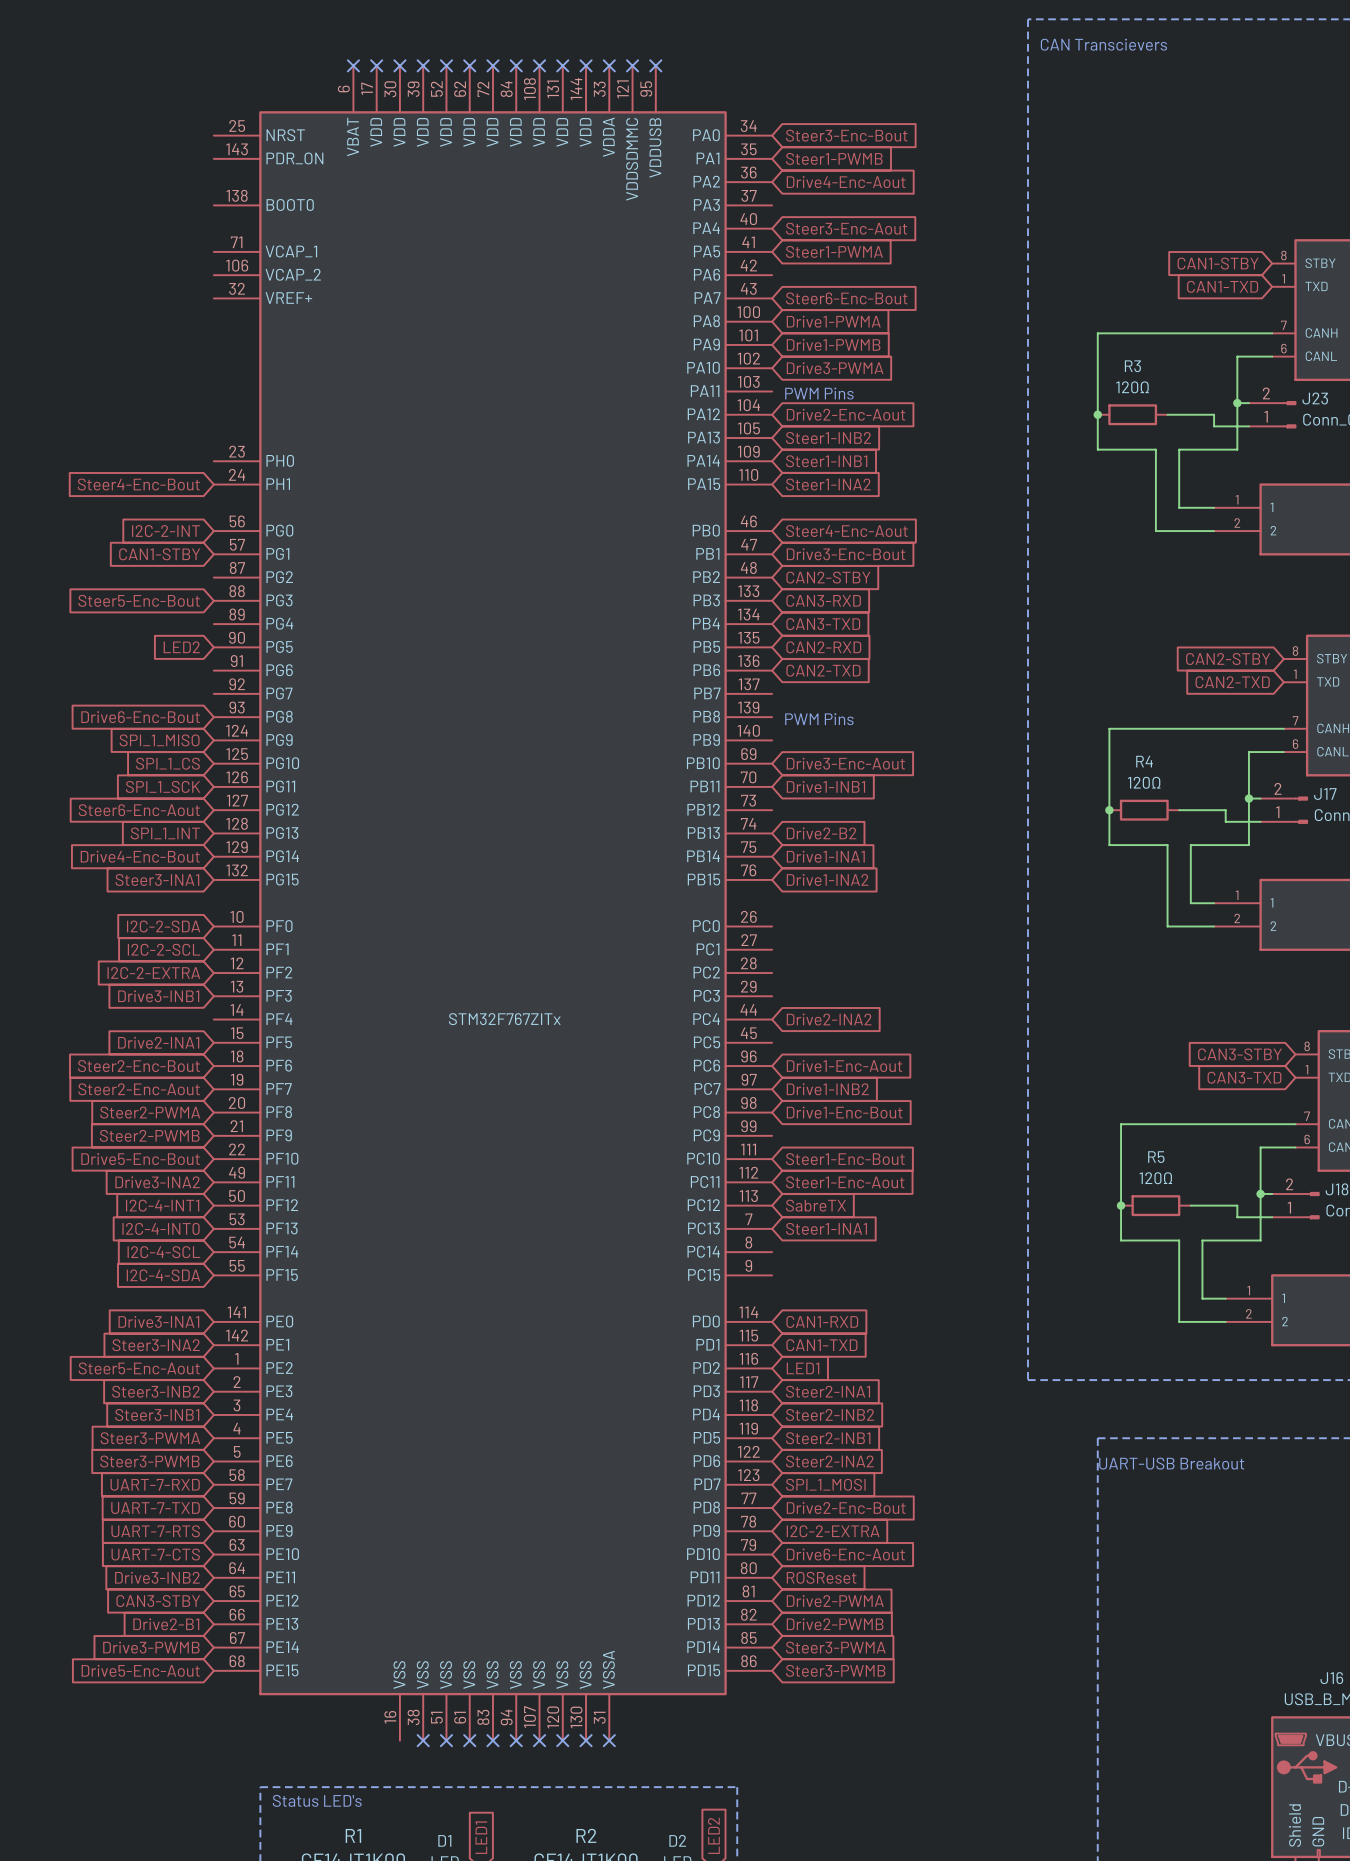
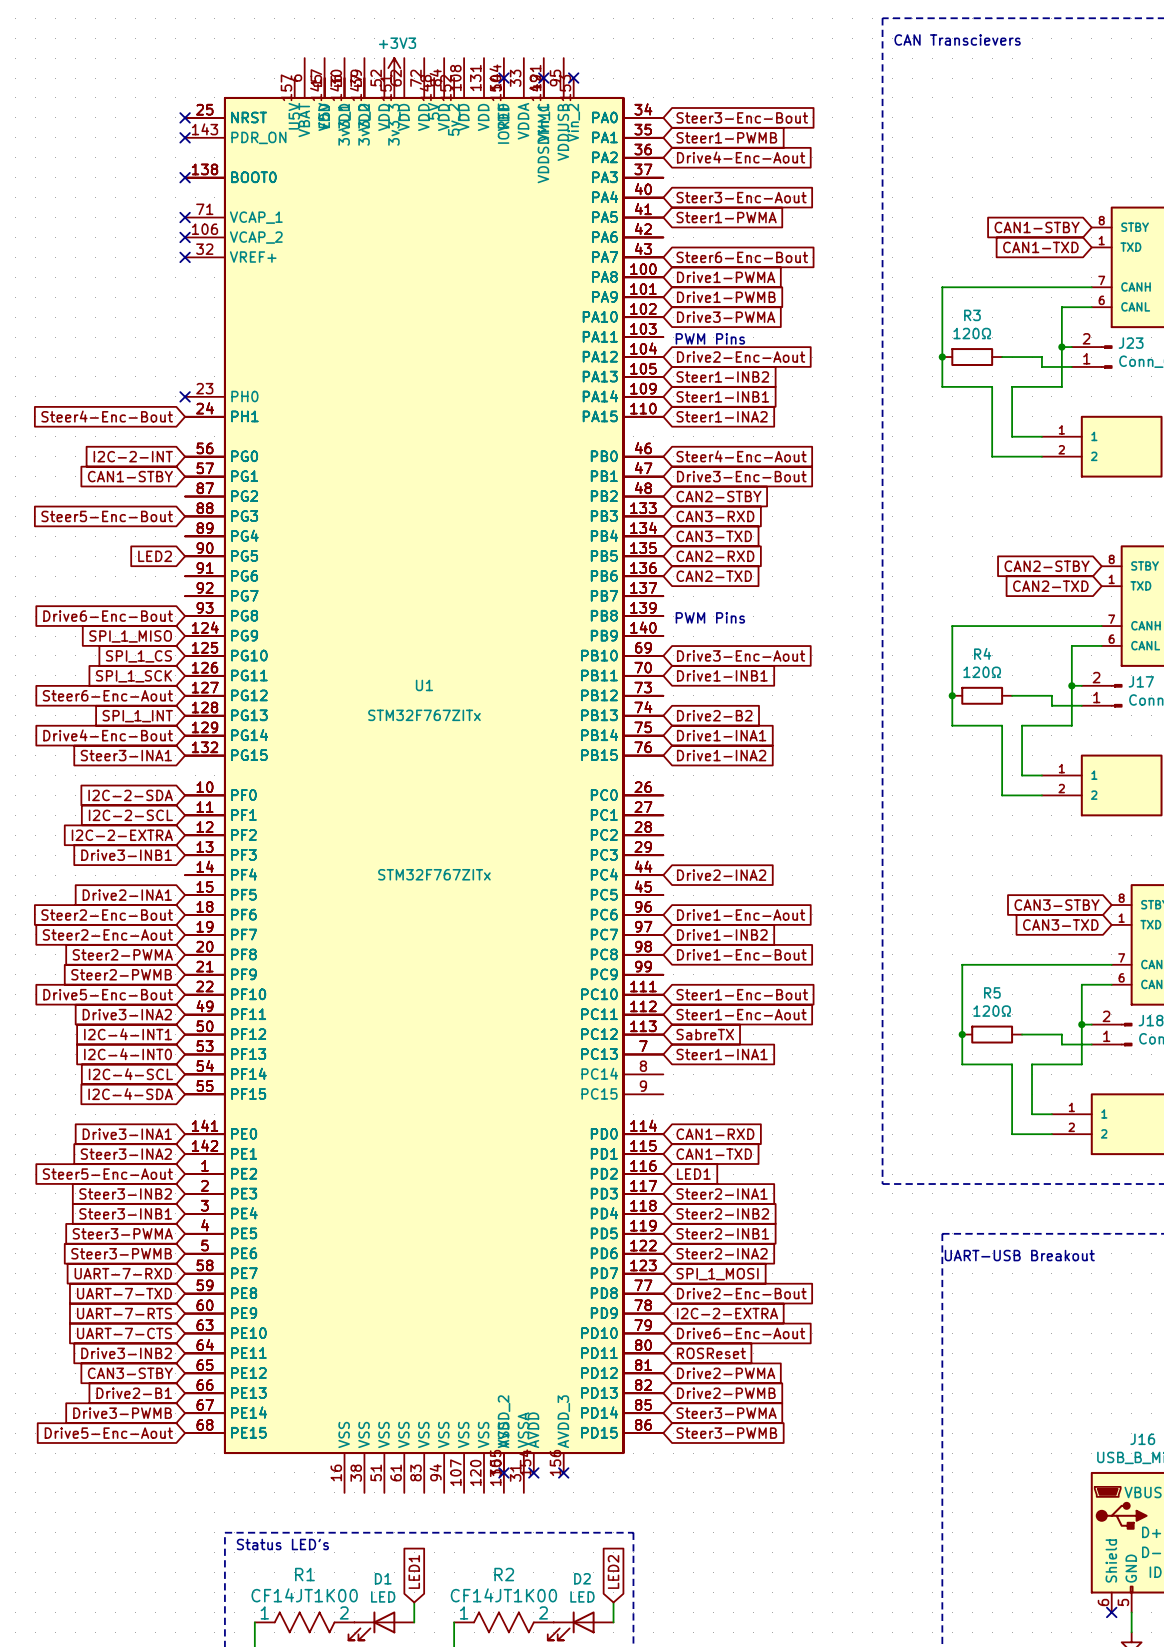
no-connect mark: (353, 65) -> none
no-connect mark: (376, 65) -> none
no-connect mark: (399, 65) -> none
no-connect mark: (423, 65) -> none
no-connect mark: (446, 65) -> none
no-connect mark: (469, 65) -> none
no-connect mark: (492, 65) -> none
no-connect mark: (516, 65) -> none
no-connect mark: (539, 65) -> none
no-connect mark: (562, 65) -> none
no-connect mark: (586, 65) -> none
no-connect mark: (609, 65) -> none
no-connect mark: (632, 65) -> none
no-connect mark: (655, 65) -> none
power symbol: none -> +3V3 (394, 68)
no-connect mark: none -> (503, 78)
no-connect mark: none -> (543, 78)
no-connect mark: none -> (573, 78)
no-connect mark: none -> (185, 117)
no-connect mark: none -> (185, 137)
no-connect mark: none -> (185, 177)
no-connect mark: none -> (185, 217)
no-connect mark: none -> (185, 237)
no-connect mark: none -> (185, 257)
no-connect mark: none -> (185, 396)
U1: none -> STM32F767ZITx (424, 775)
no-connect mark: none -> (503, 1472)
no-connect mark: none -> (533, 1472)
no-connect mark: none -> (563, 1472)
no-connect mark: (423, 1740) -> none
no-connect mark: (446, 1740) -> none
no-connect mark: (469, 1740) -> none
no-connect mark: (492, 1740) -> none
no-connect mark: (516, 1740) -> none
no-connect mark: (539, 1740) -> none
no-connect mark: (562, 1740) -> none
no-connect mark: (586, 1740) -> none
no-connect mark: (609, 1740) -> none

